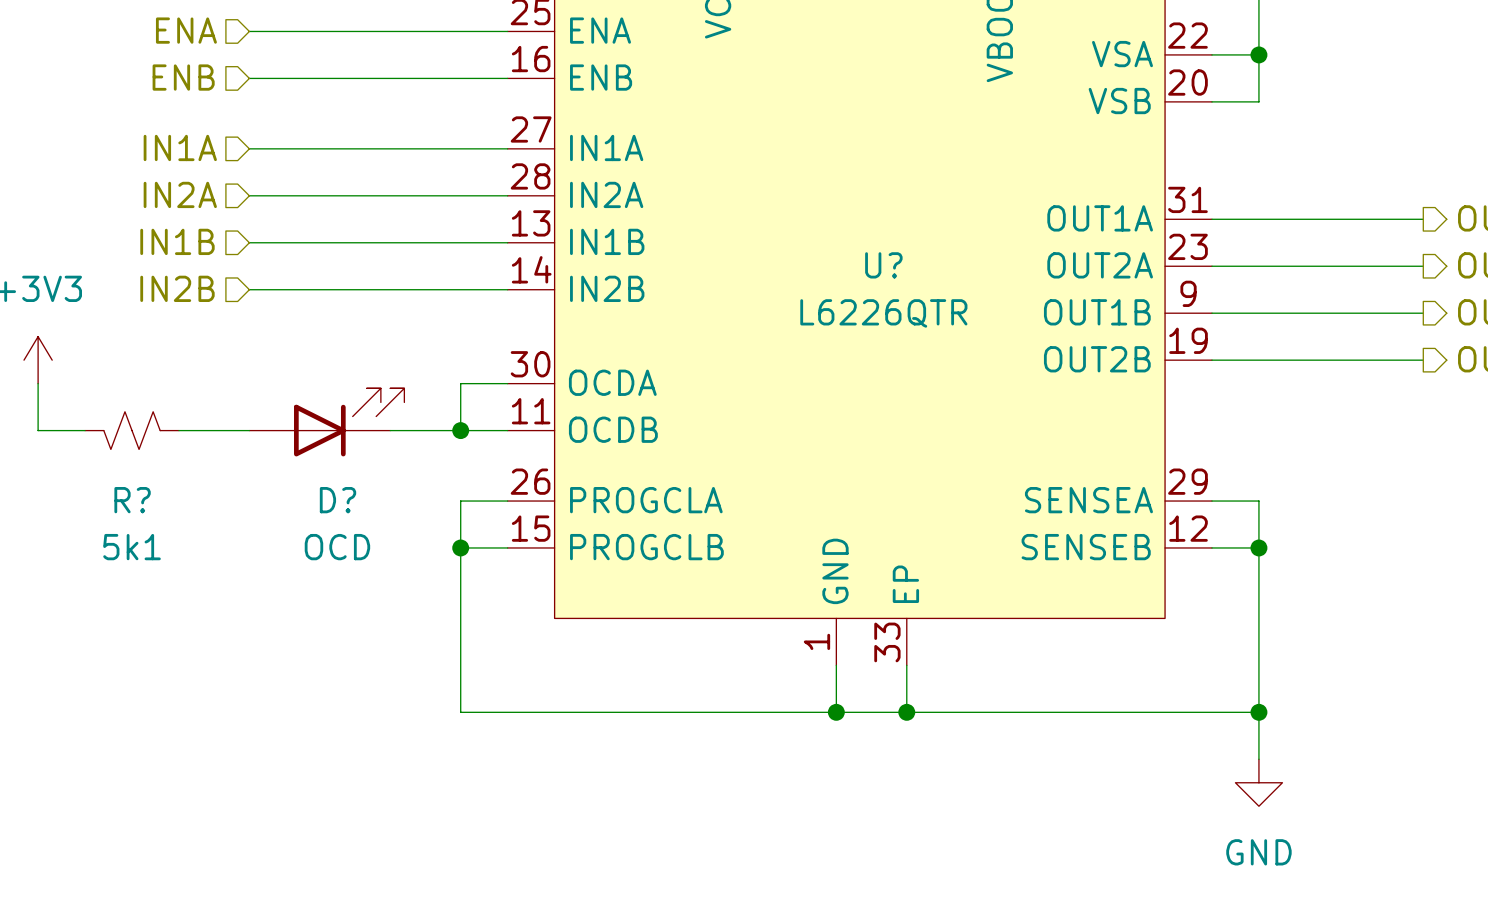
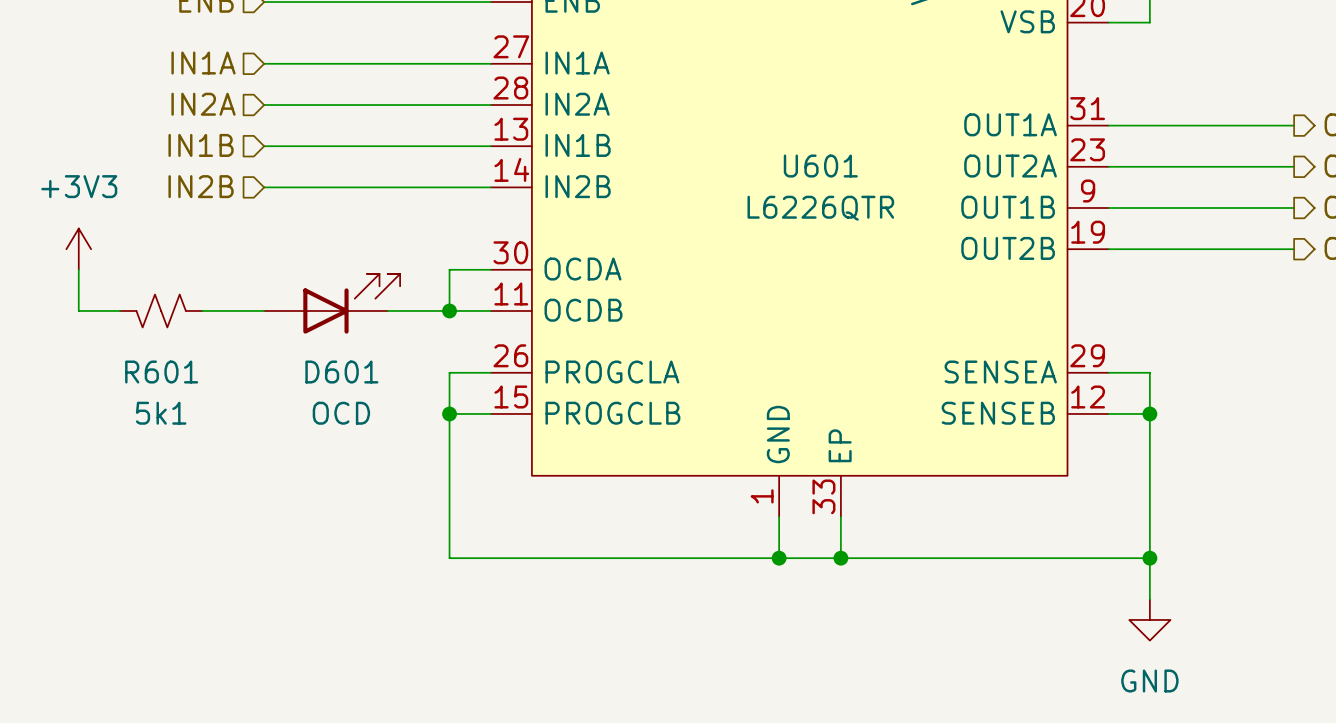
U? name: U? (883, 265) -> U601 (820, 166)
R? name: R? (132, 500) -> R601 (161, 372)
D? name: D? (338, 500) -> D601 (341, 372)

